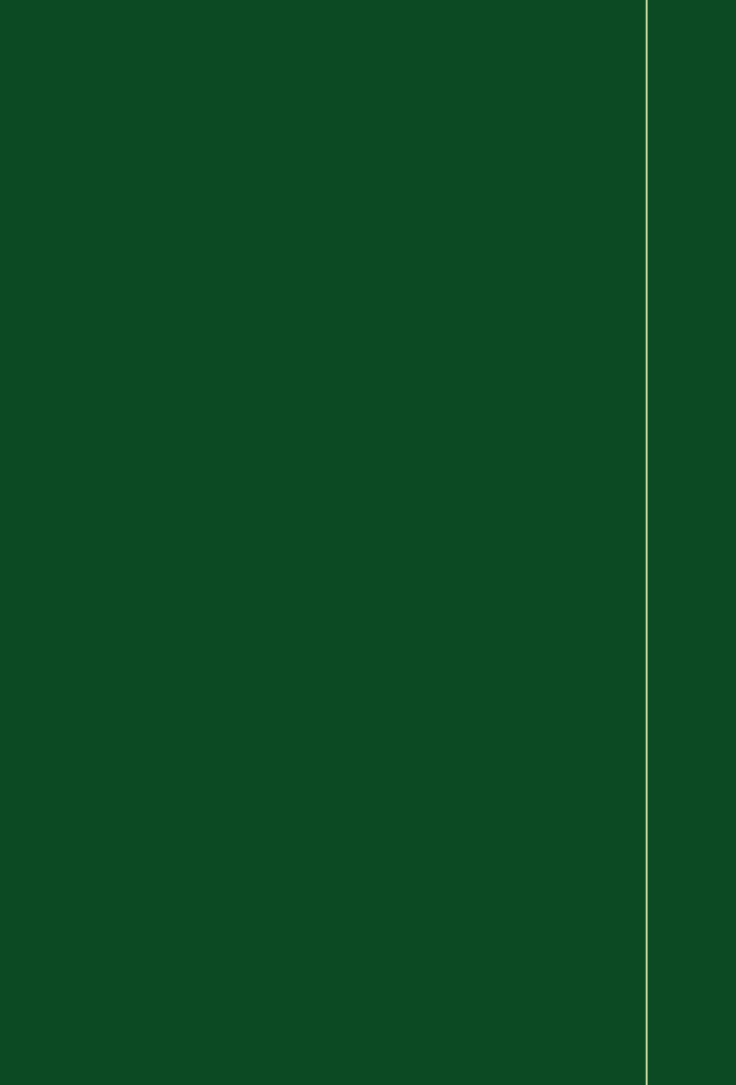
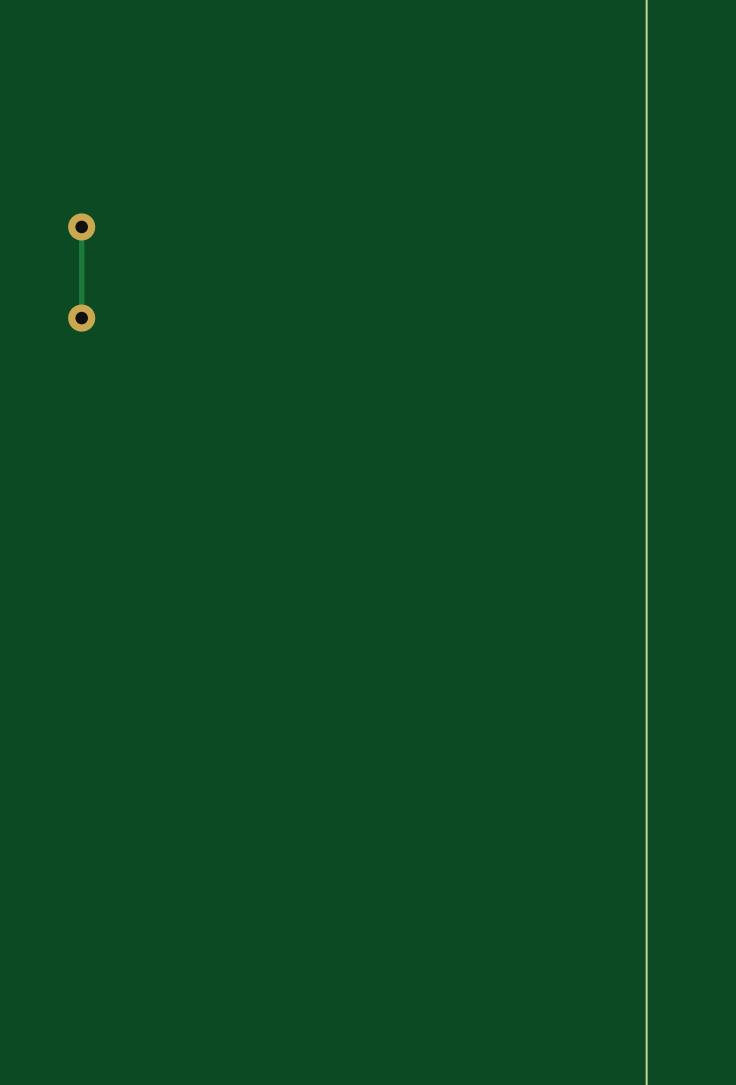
track: none -> (81, 226) (81, 318)
via: none -> (81, 226)
via: none -> (81, 318)

